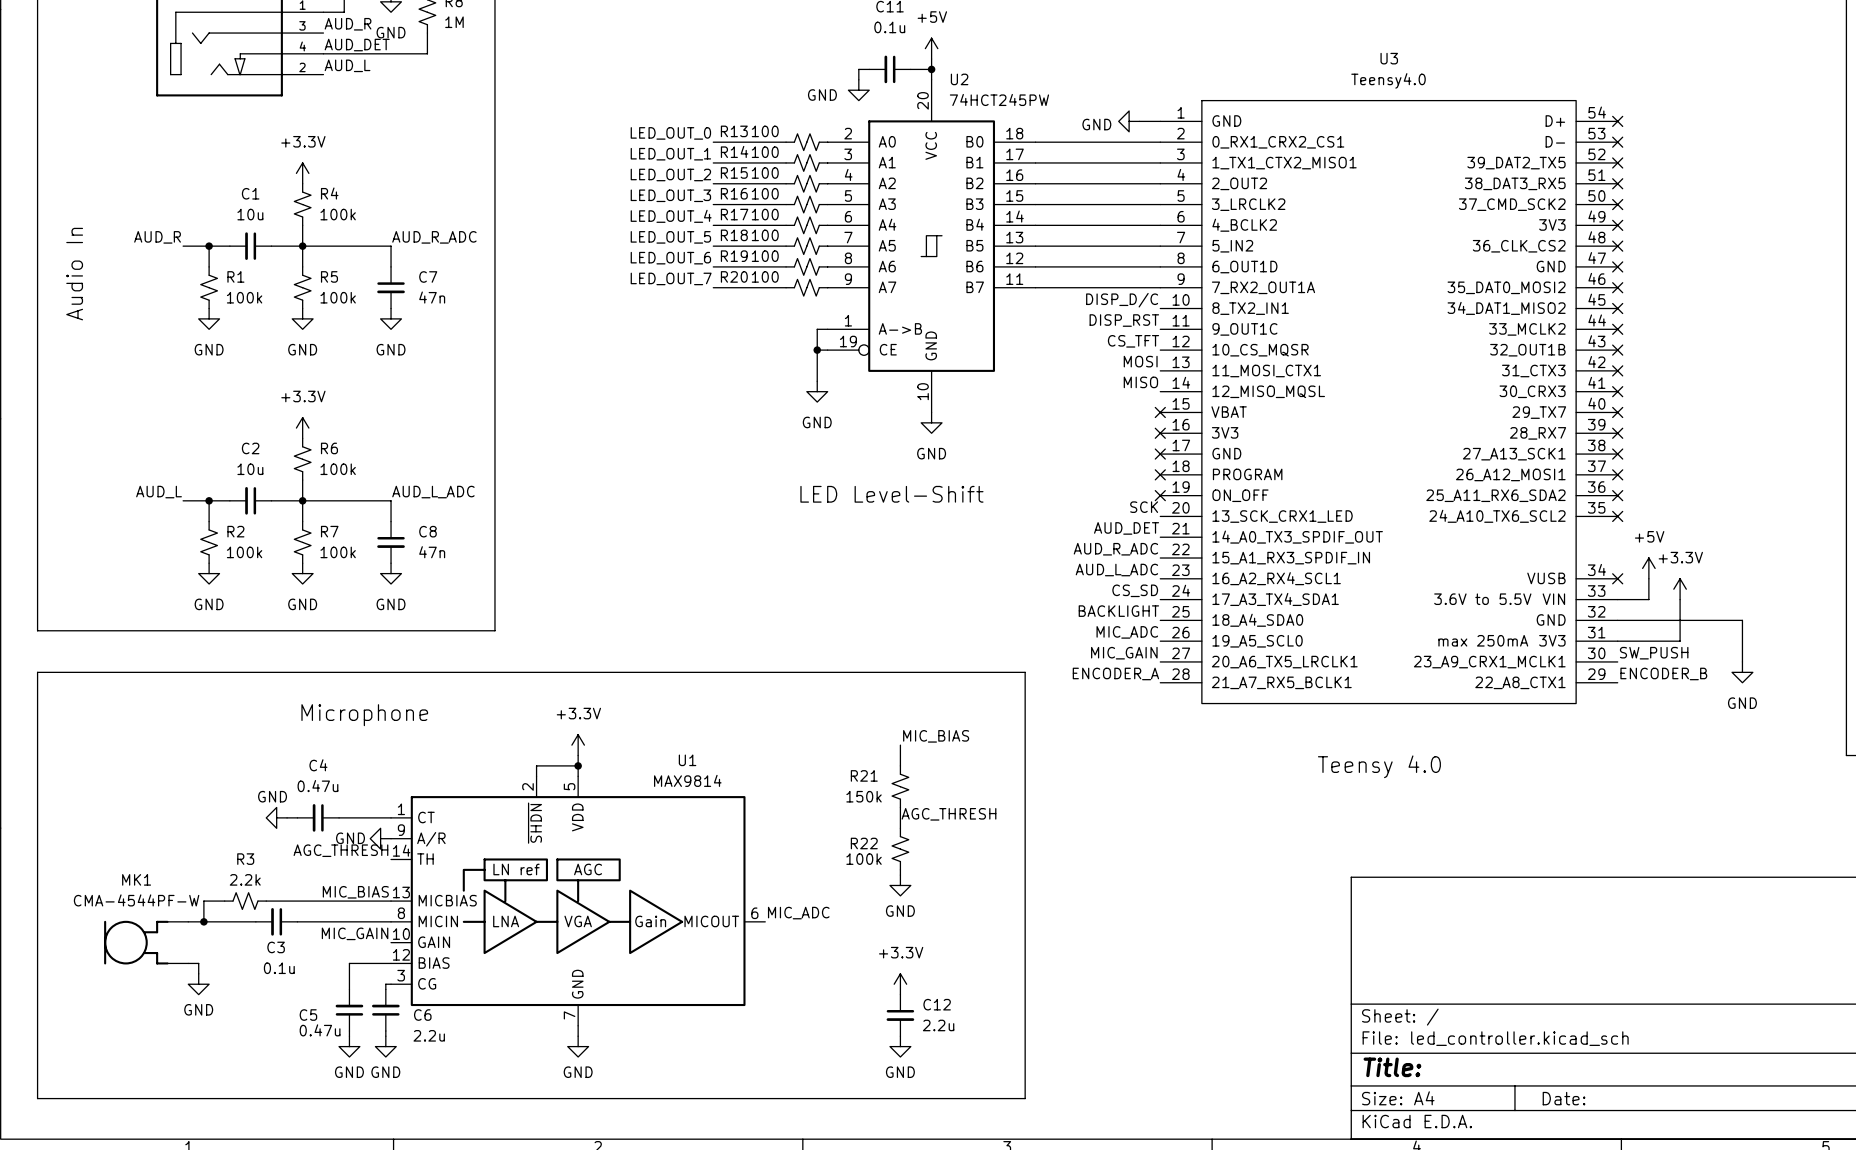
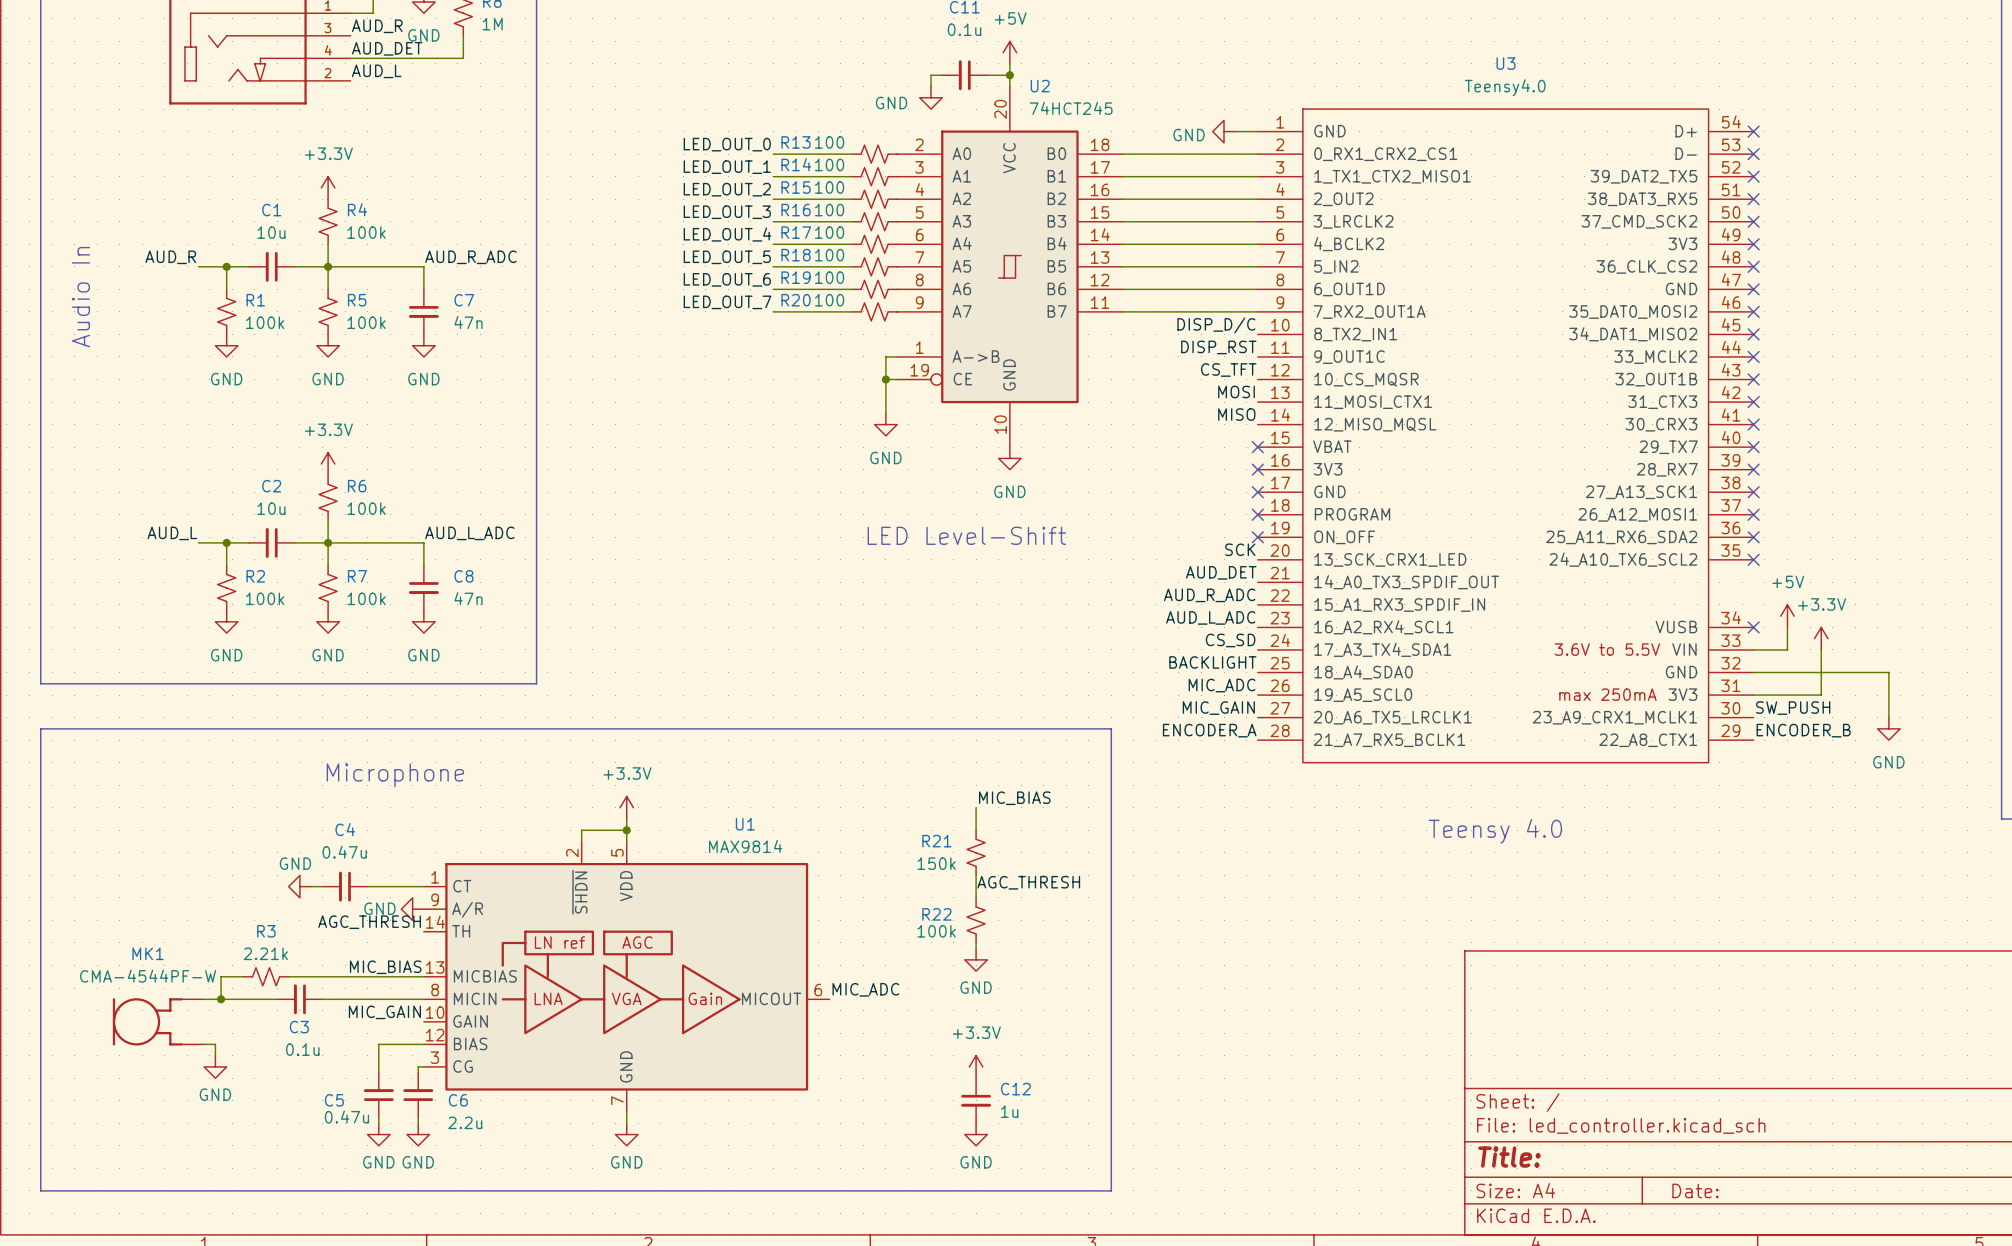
U2 value: 74HCT245PW (999, 99) -> 74HCT245 (1071, 108)
R3 value: 2.2k (245, 879) -> 2.21k (265, 953)
C12 value: 2.2u (938, 1025) -> 1u (1009, 1111)

